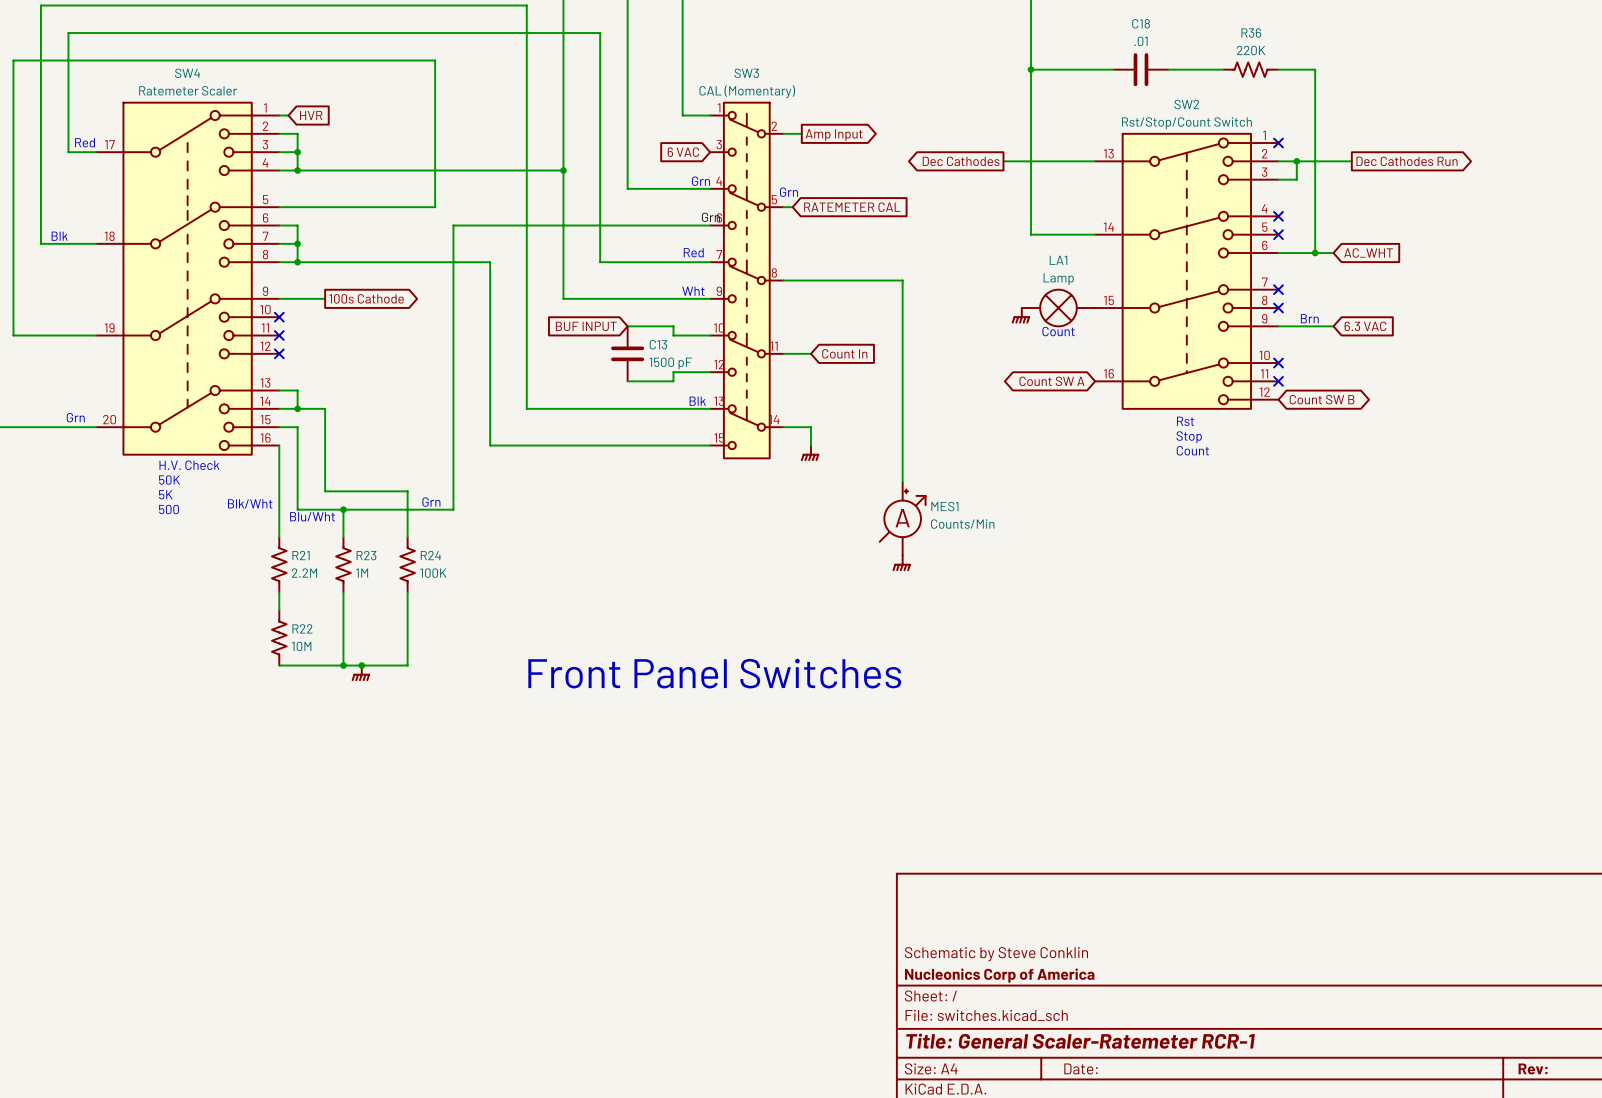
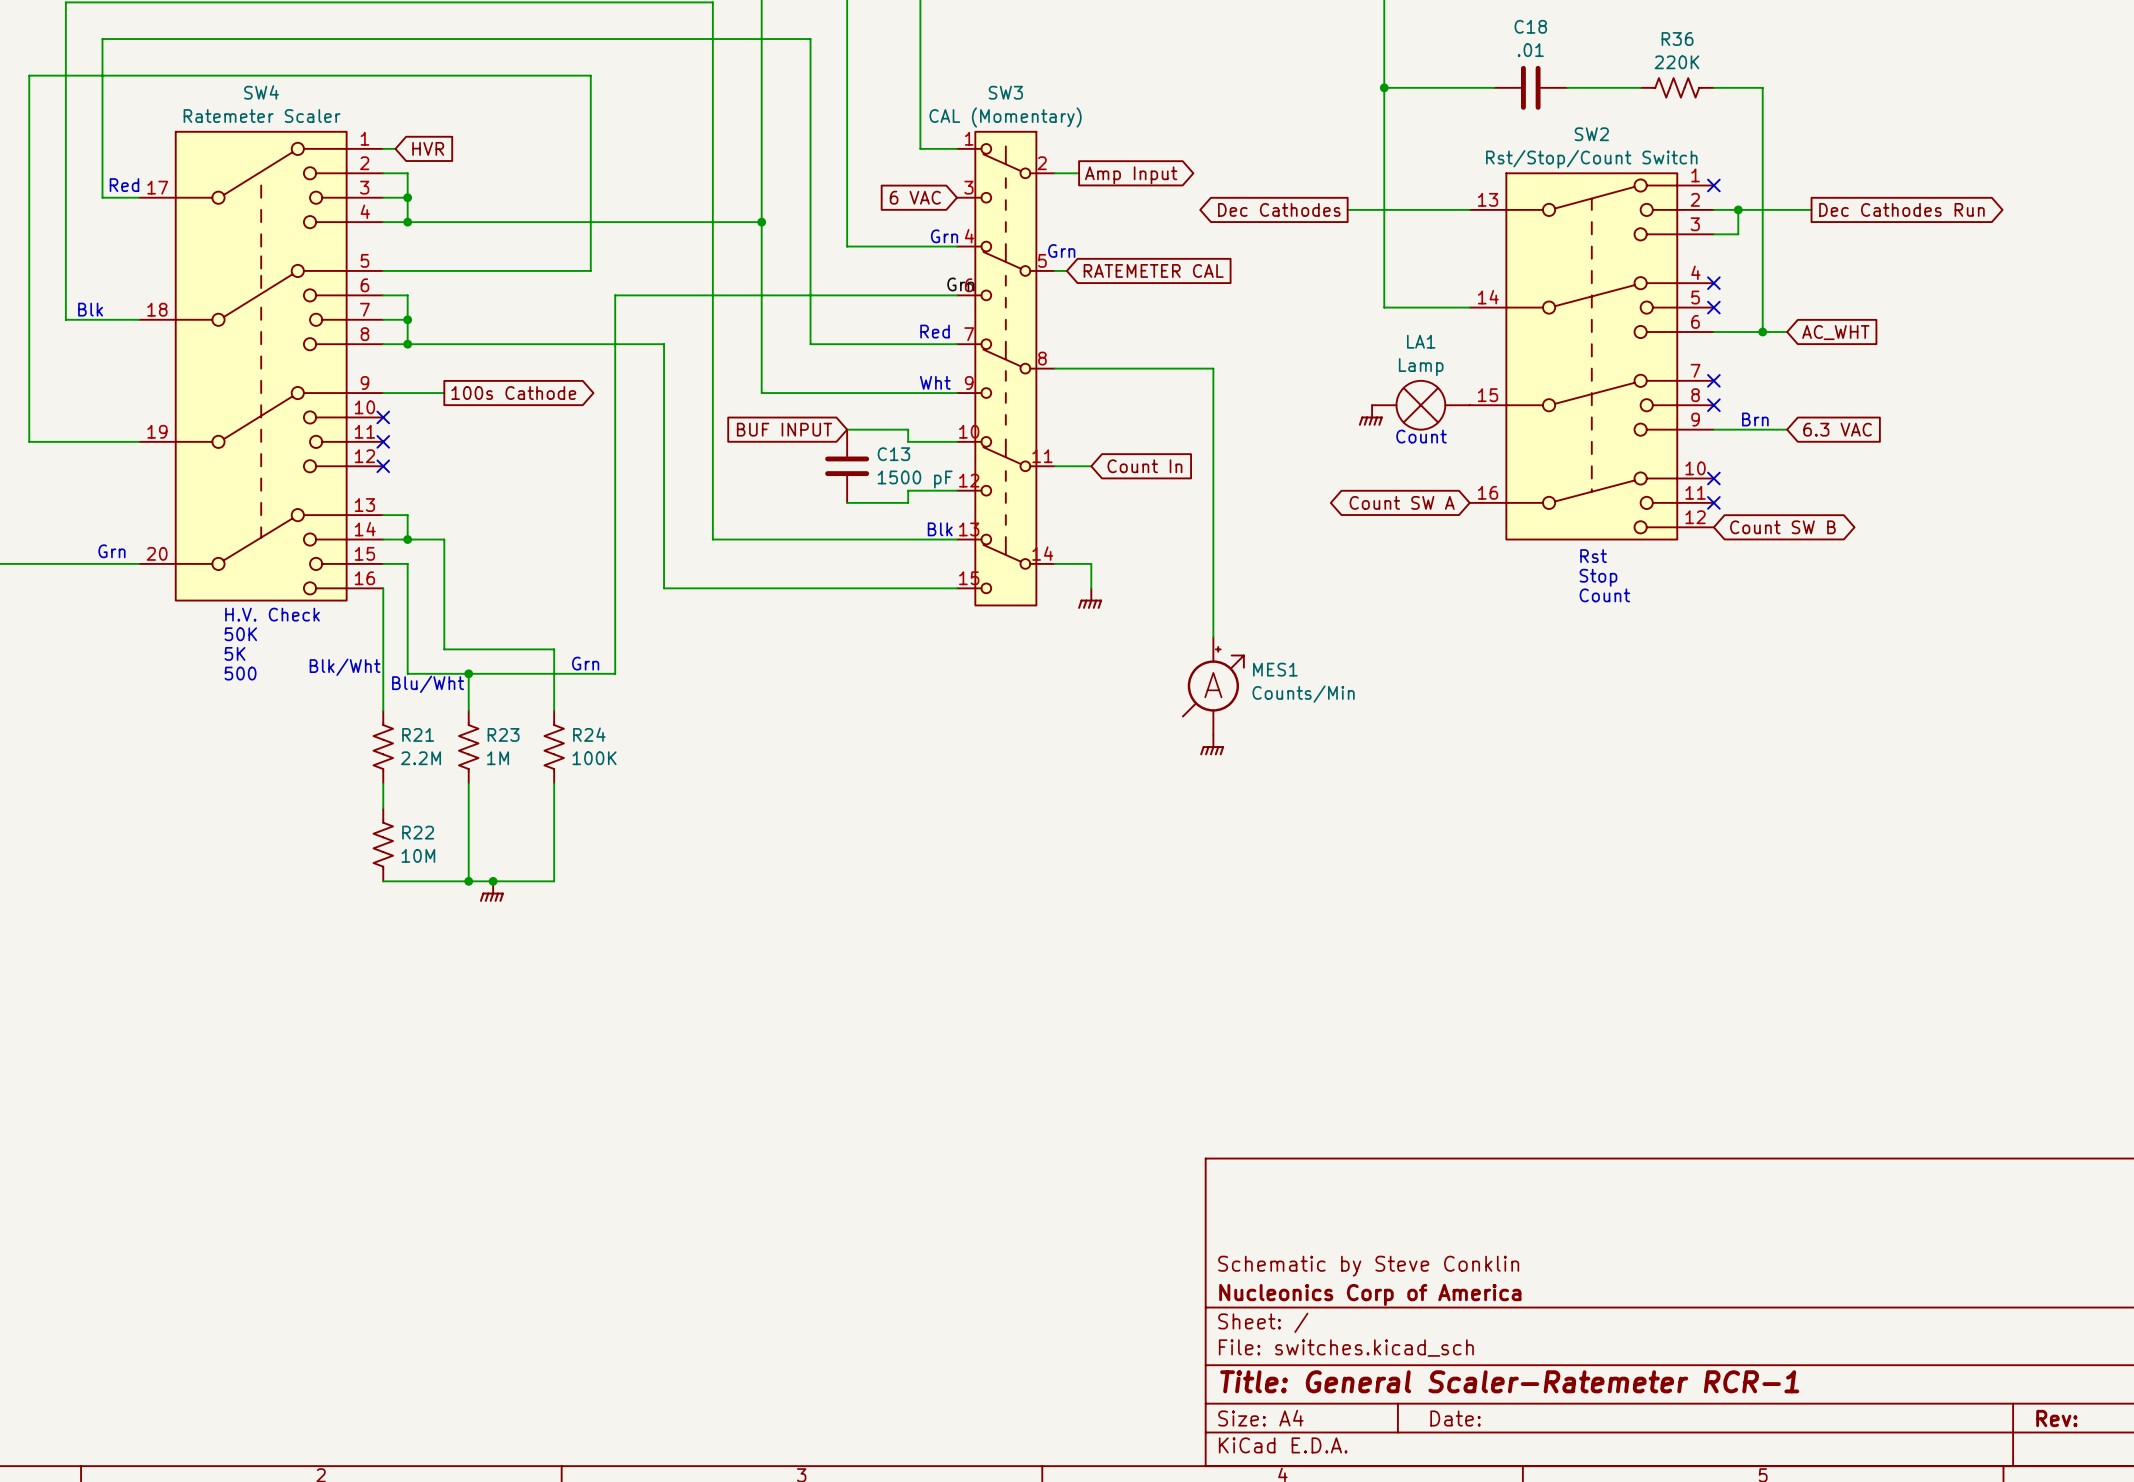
text: Front Panel Switches (714, 673) -> none

